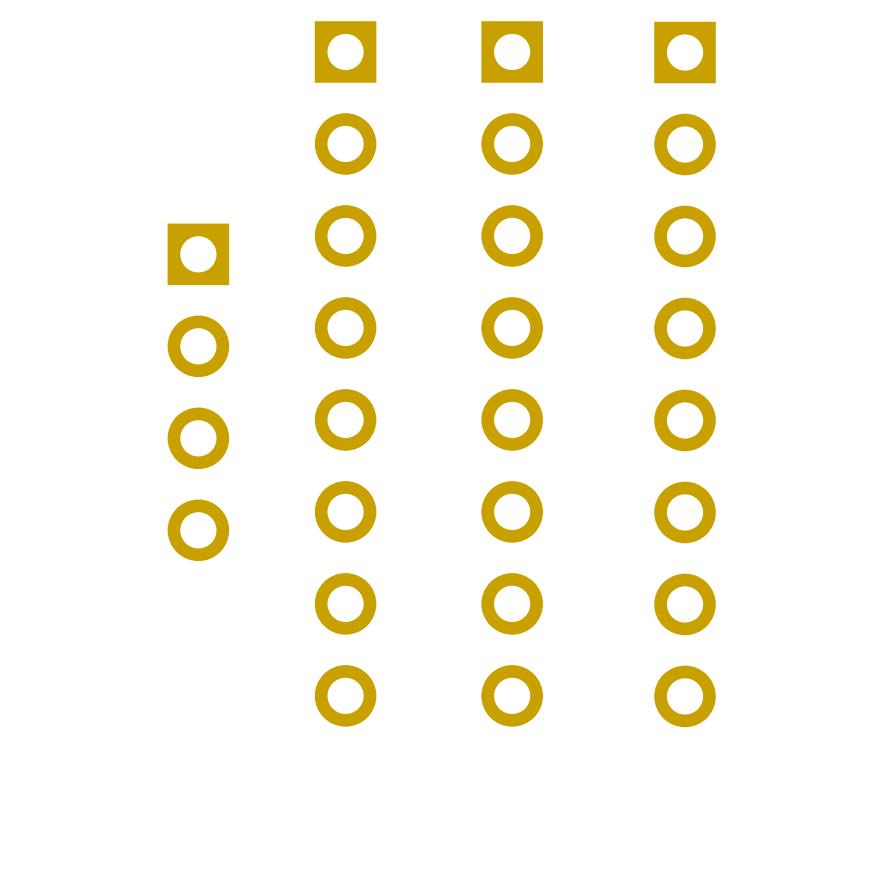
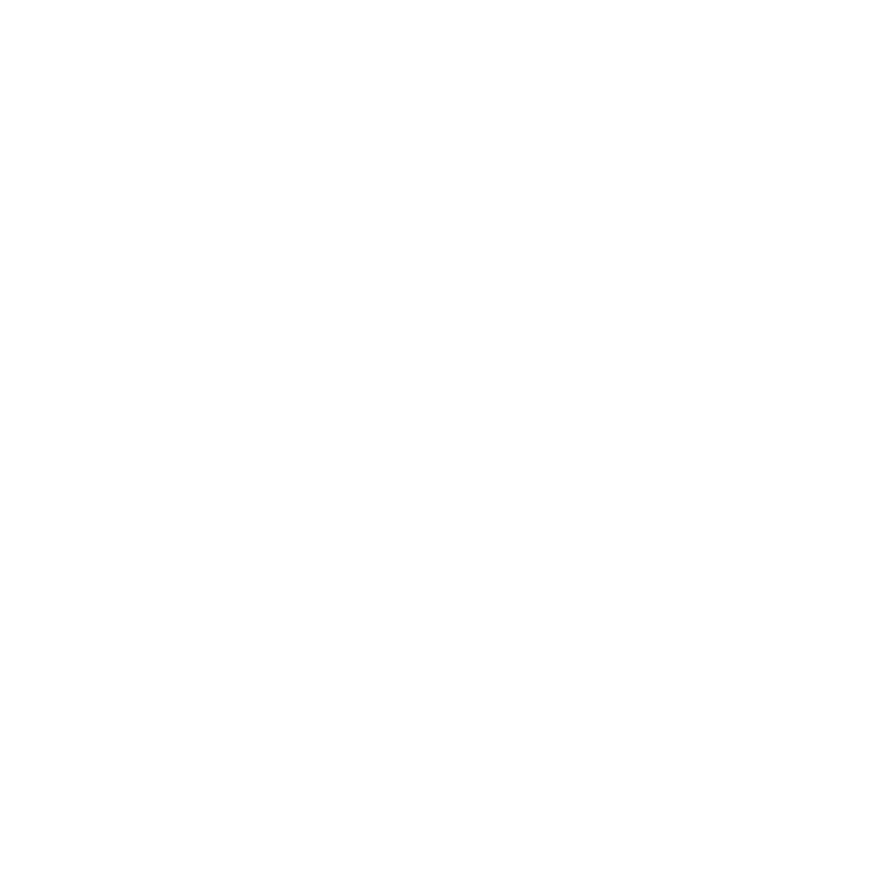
part: (345, 373) -> none
part: (512, 373) -> none
part: (685, 374) -> none
part: (198, 392) -> none

